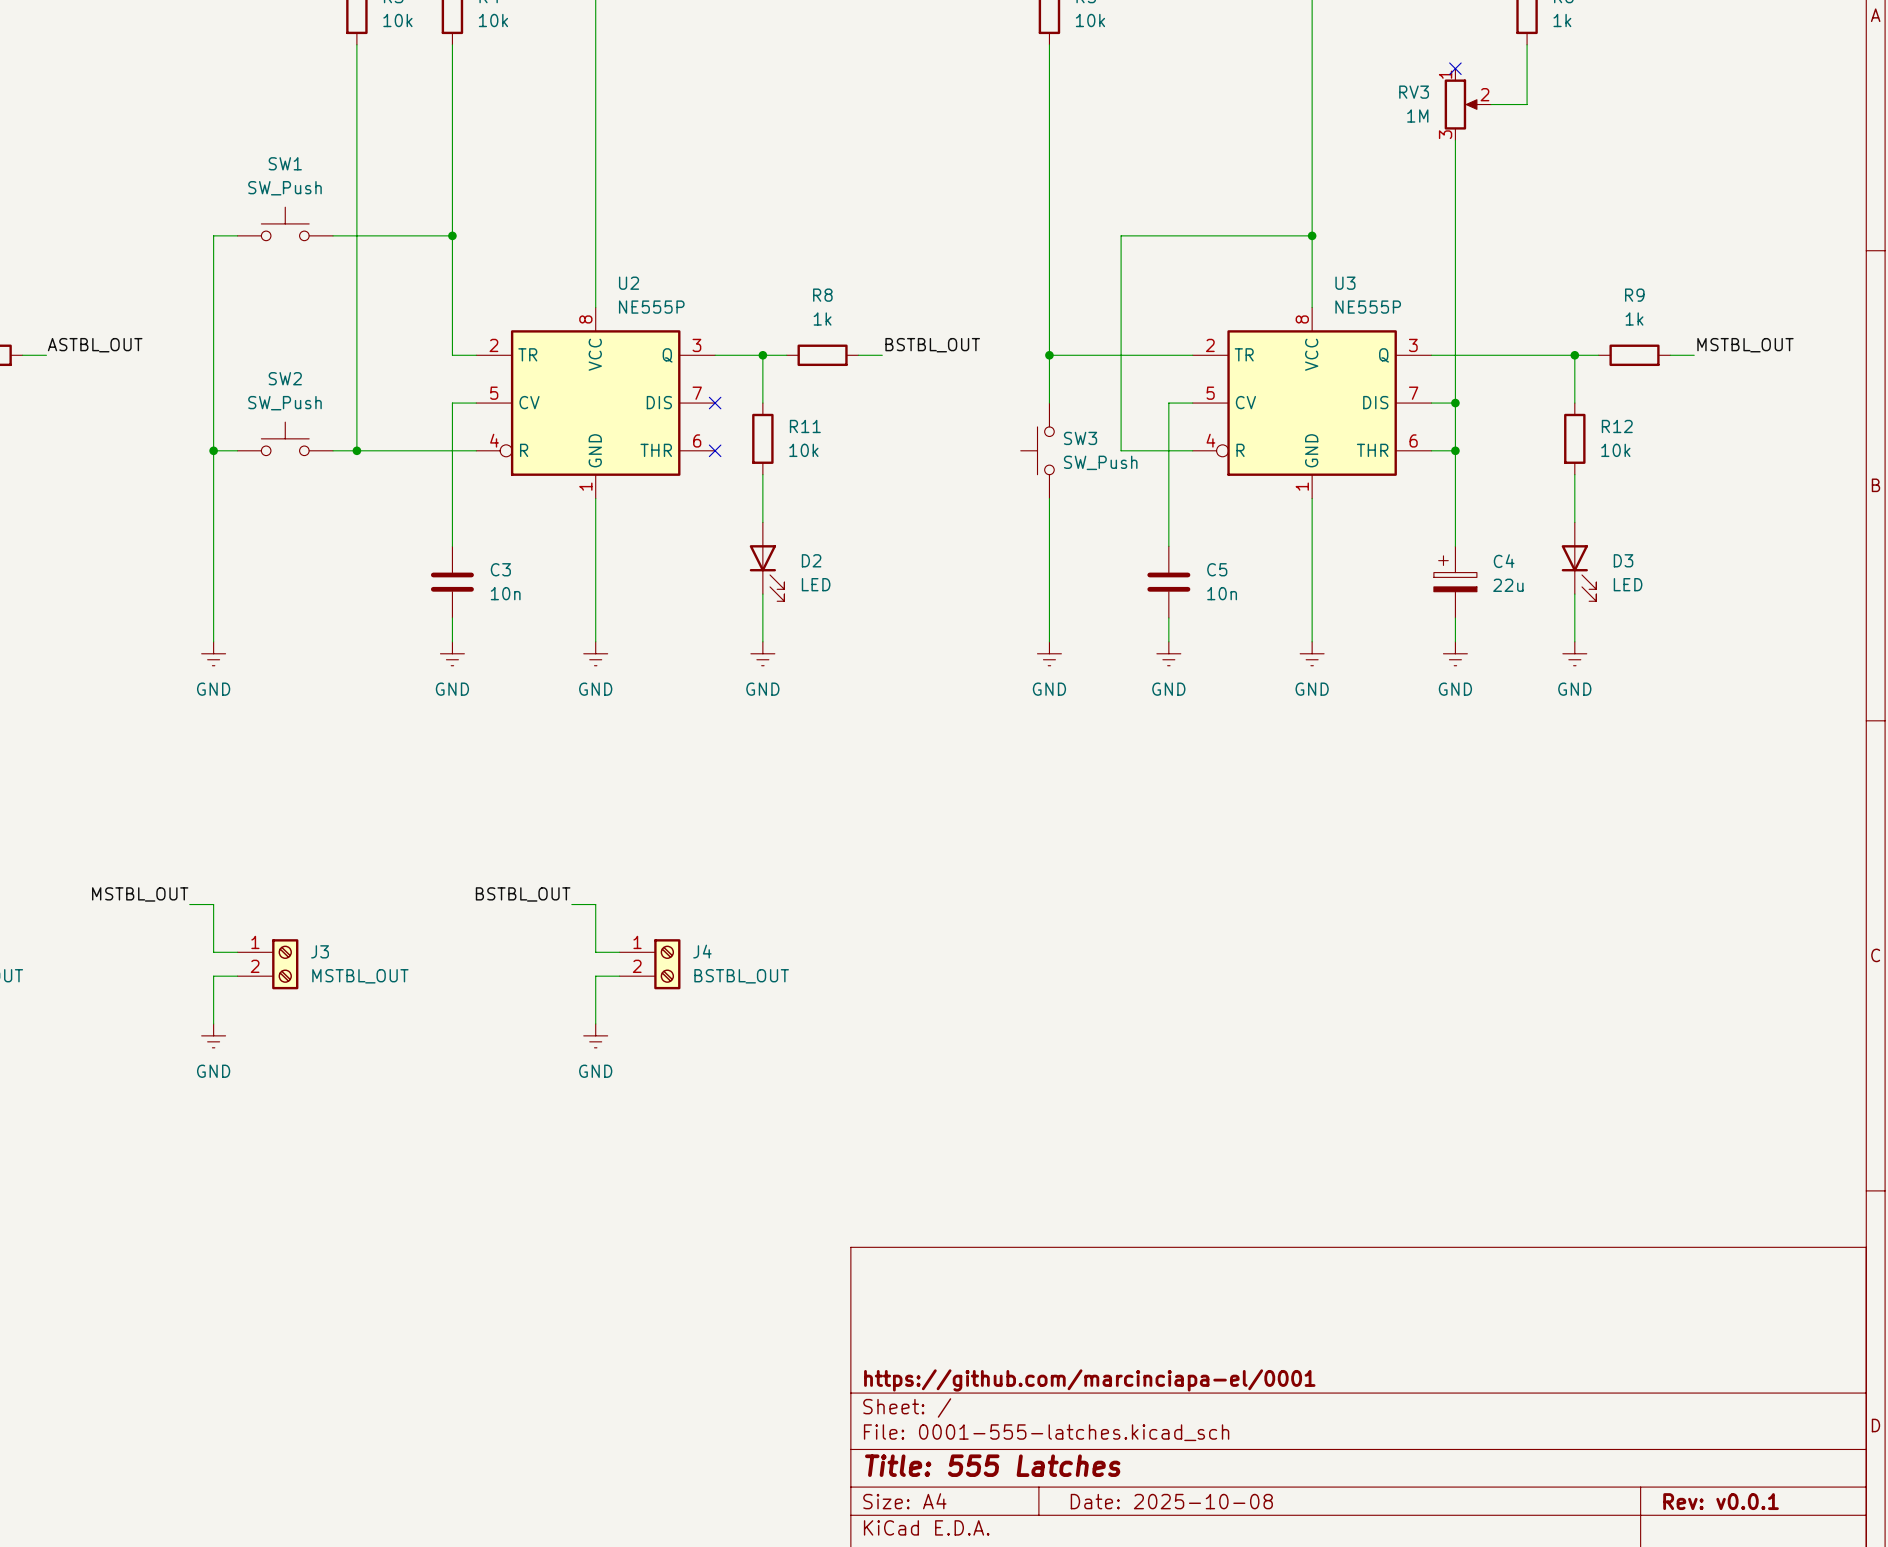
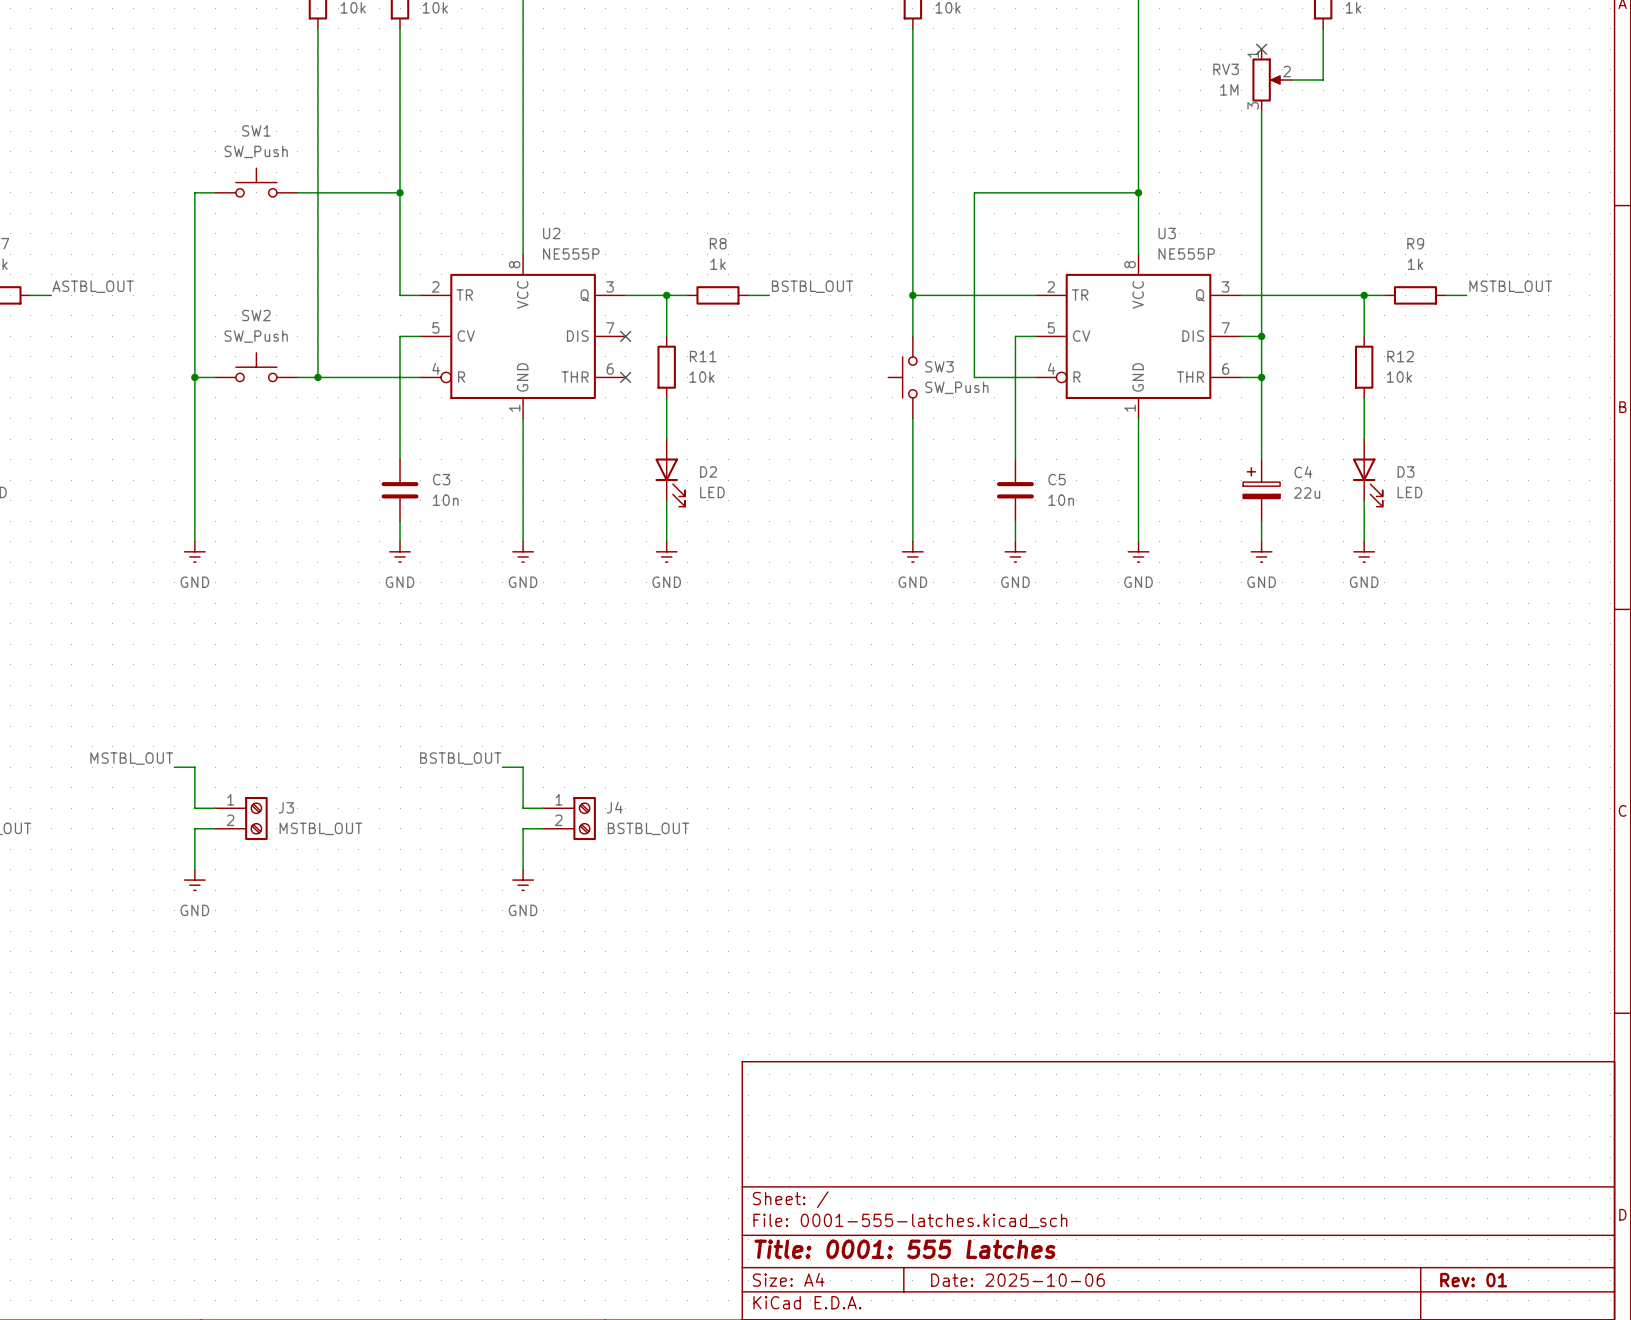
title block: https://github.com/marcinciapa-el/0001 (1089, 1380) -> none
title block: Title: 555 Latches (992, 1465) -> Title: 0001: 555 Latches (904, 1249)
title block: Date: 2025-10-08 (1171, 1501) -> Date: 2025-10-06 (1017, 1280)
title block: Rev: v0.0.1 (1721, 1501) -> Rev: 01 (1473, 1280)

